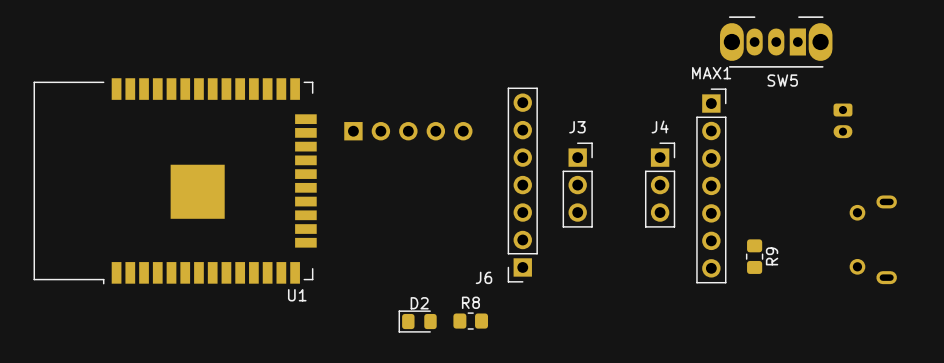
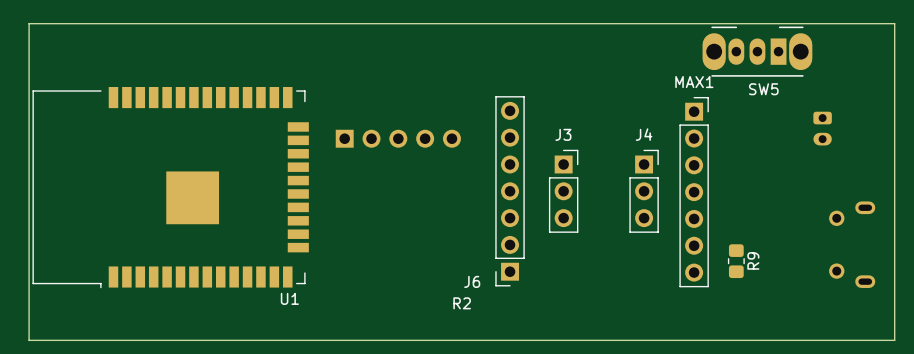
board edge: none -> (29, 23) (894, 23) (894, 340) (29, 340) (29, 23)
R2: none -> (462, 303)
D2: (417, 321) -> none
R8: (470, 321) -> none

